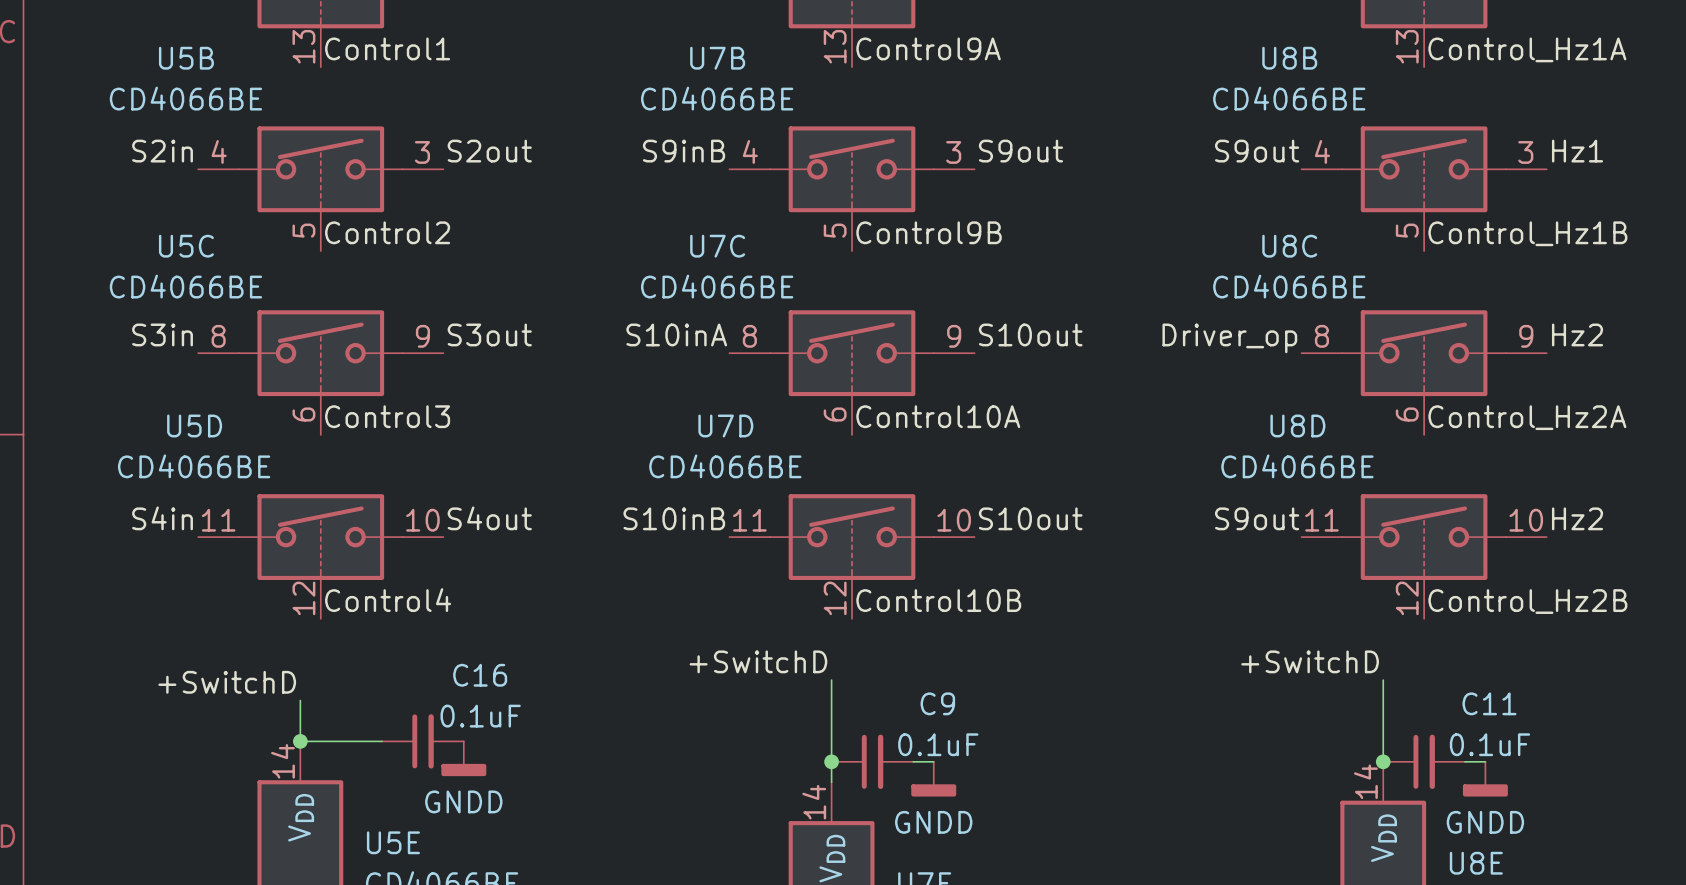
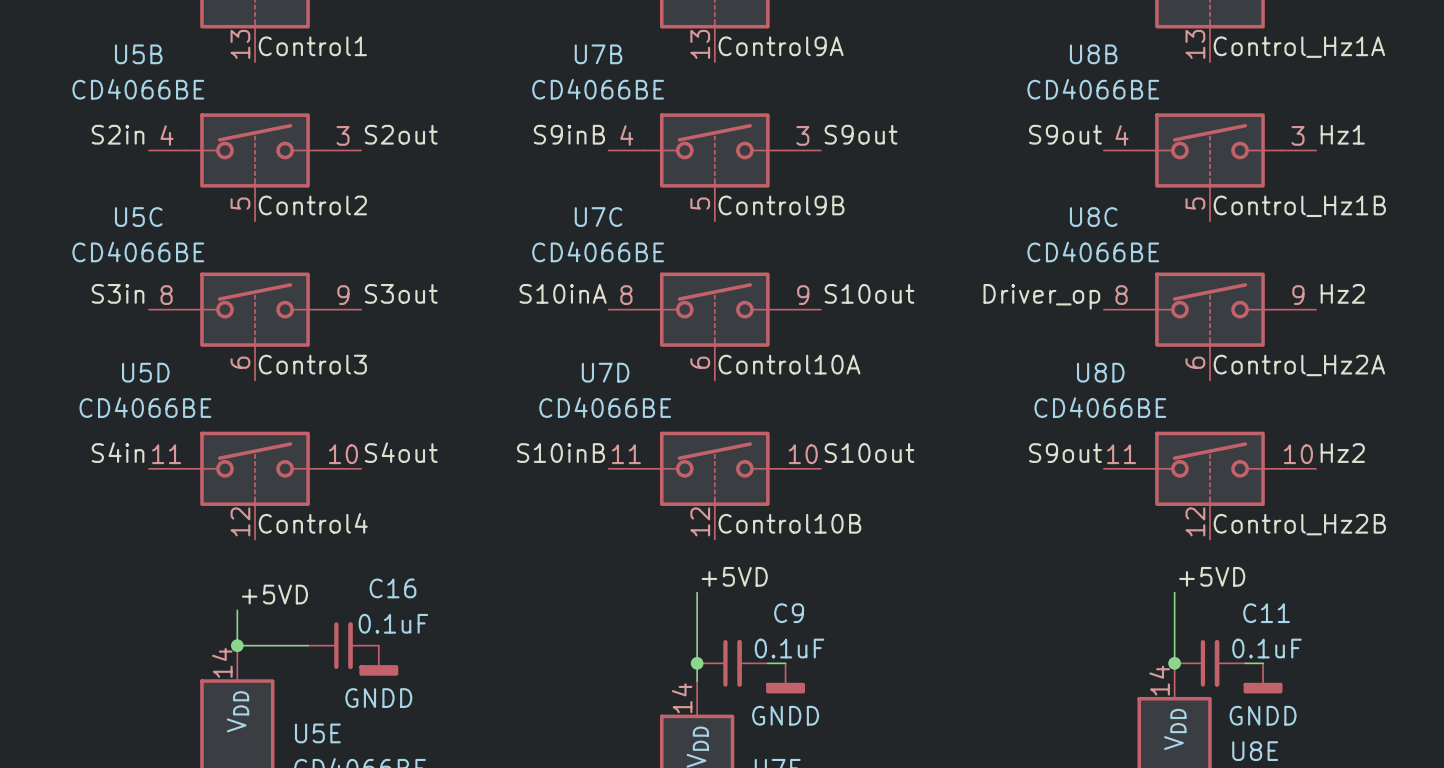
label: +SwitchD (758, 661) -> +5VD (734, 576)
label: +SwitchD (1310, 661) -> +5VD (1212, 576)
label: +SwitchD (227, 682) -> +5VD (274, 594)

